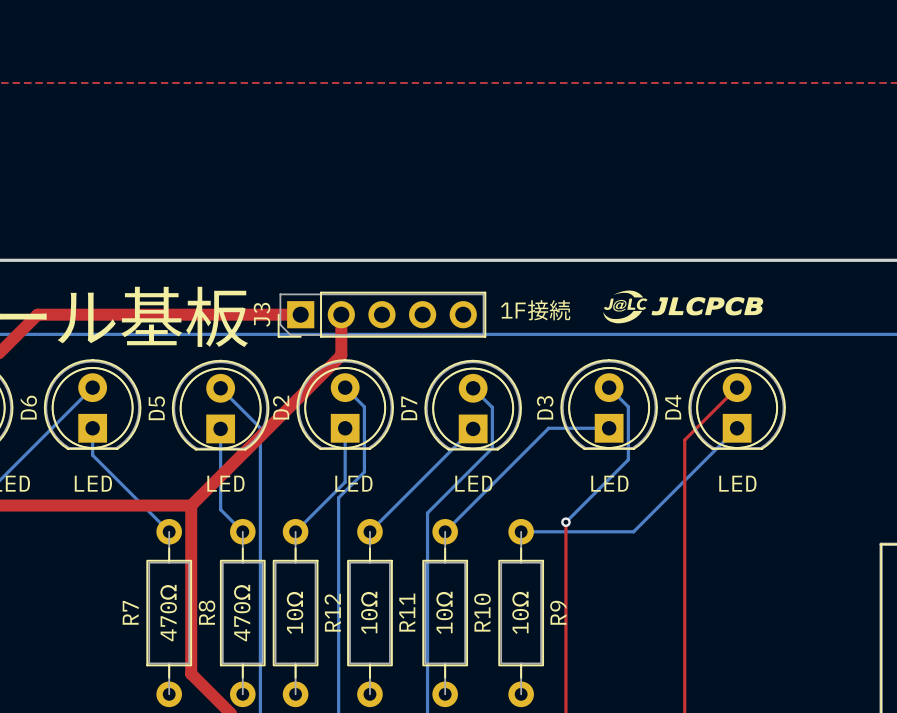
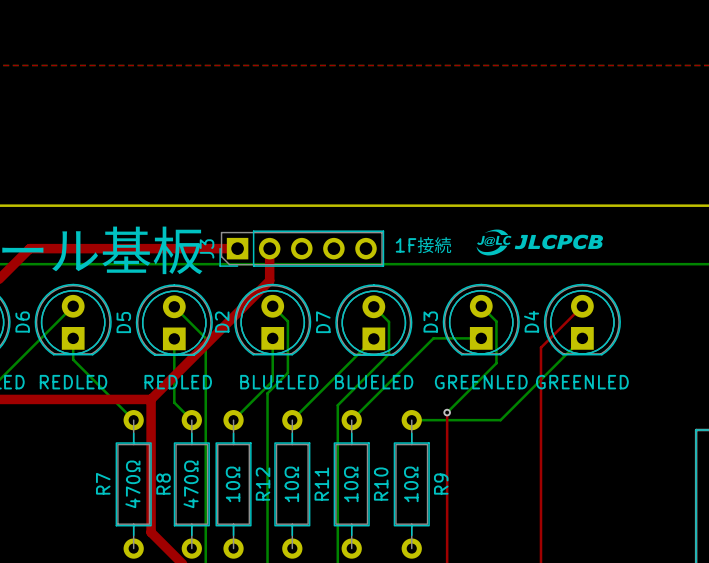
D6 value: LED (93, 483) -> REDLED (73, 382)
D5 value: LED (225, 483) -> REDLED (178, 382)
D2 value: LED (353, 483) -> BLUELED (279, 382)
D7 value: LED (473, 483) -> BLUELED (374, 382)
D3 value: LED (609, 483) -> GREENLED (481, 382)
D4 value: LED (737, 483) -> GREENLED (582, 382)

